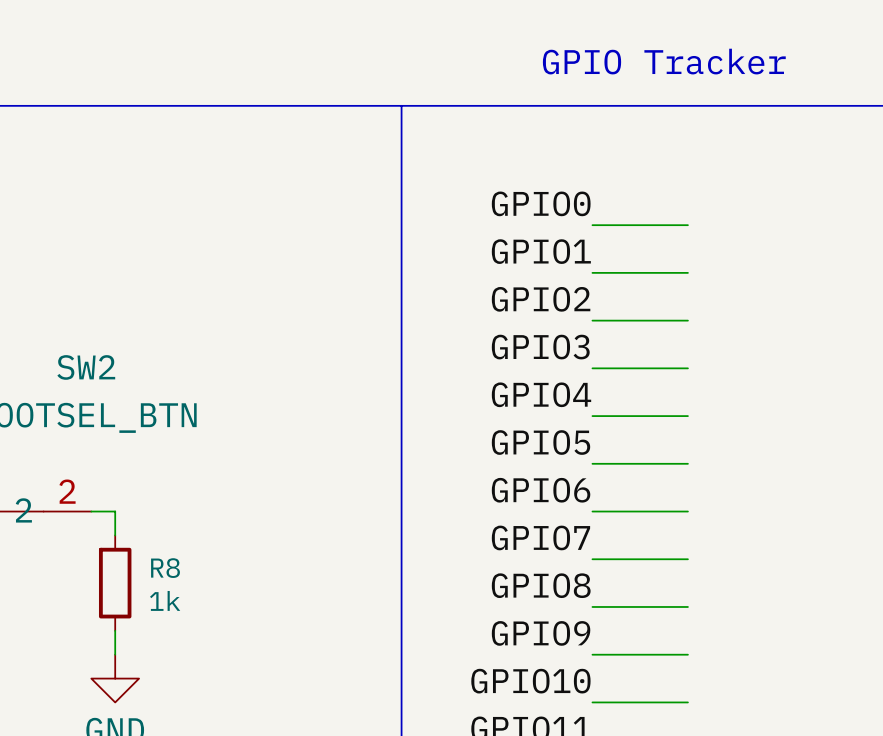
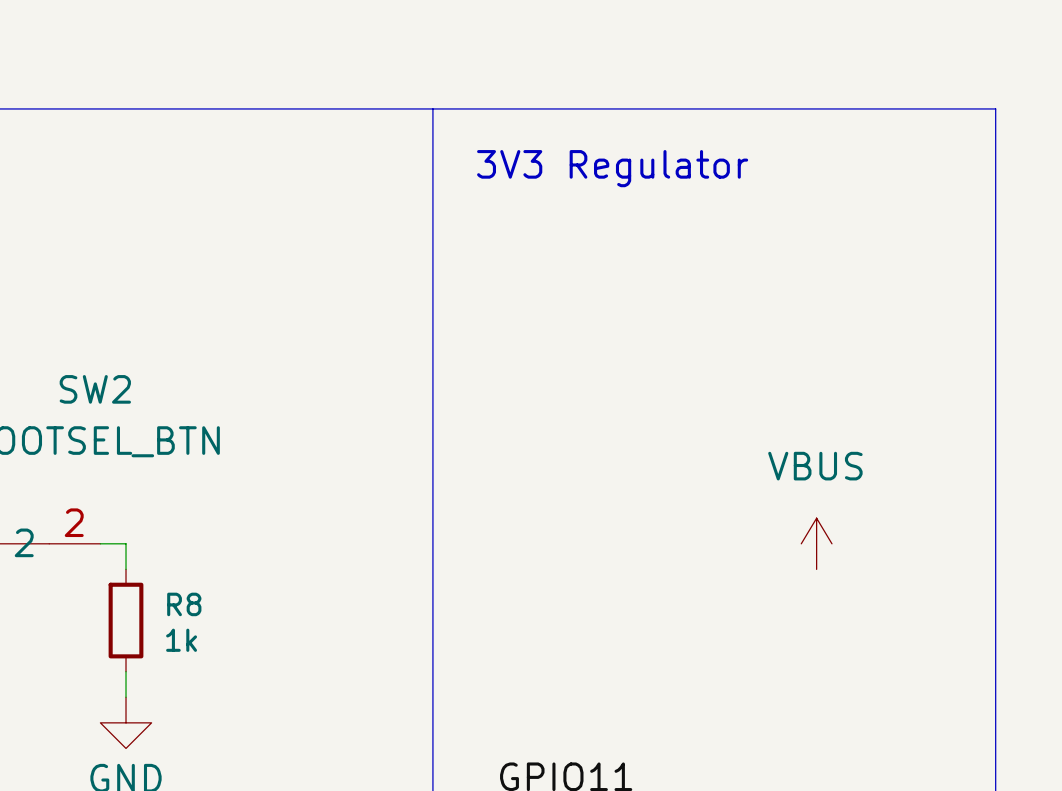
text: GPIO Tracker (664, 61) -> none
text: none -> 3V3 Regulator (612, 168)
label: GPIO0 (541, 203) -> none
wire: (592, 225) (687, 225) -> none
label: GPIO1 (541, 251) -> none
wire: (592, 272) (687, 272) -> none
label: GPIO2 (541, 299) -> none
wire: (592, 320) (687, 320) -> none
label: GPIO3 (540, 347) -> none
wire: (592, 368) (687, 368) -> none
label: GPIO4 (541, 394) -> none
wire: (592, 416) (687, 416) -> none
label: GPIO5 (541, 442) -> none
wire: (592, 463) (687, 463) -> none
label: GPIO6 (541, 490) -> none
wire: (592, 511) (687, 511) -> none
power symbol: none -> VBUS (816, 543)
label: GPIO7 (540, 537) -> none
wire: (592, 559) (687, 559) -> none
label: GPIO8 (541, 585) -> none
wire: (592, 606) (687, 606) -> none
label: GPIO9 (541, 633) -> none
wire: (592, 654) (687, 654) -> none
label: GPIO10 (530, 681) -> none
wire: (592, 702) (687, 702) -> none

